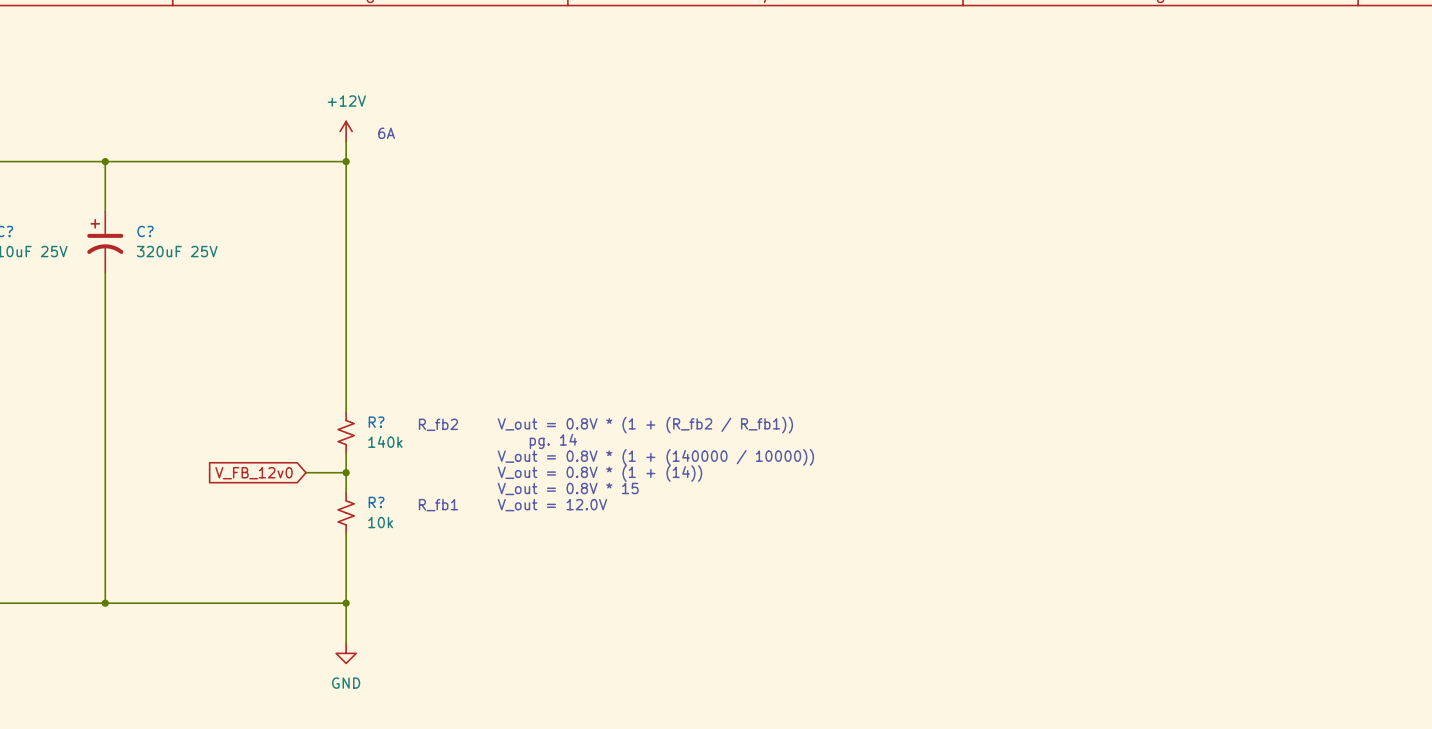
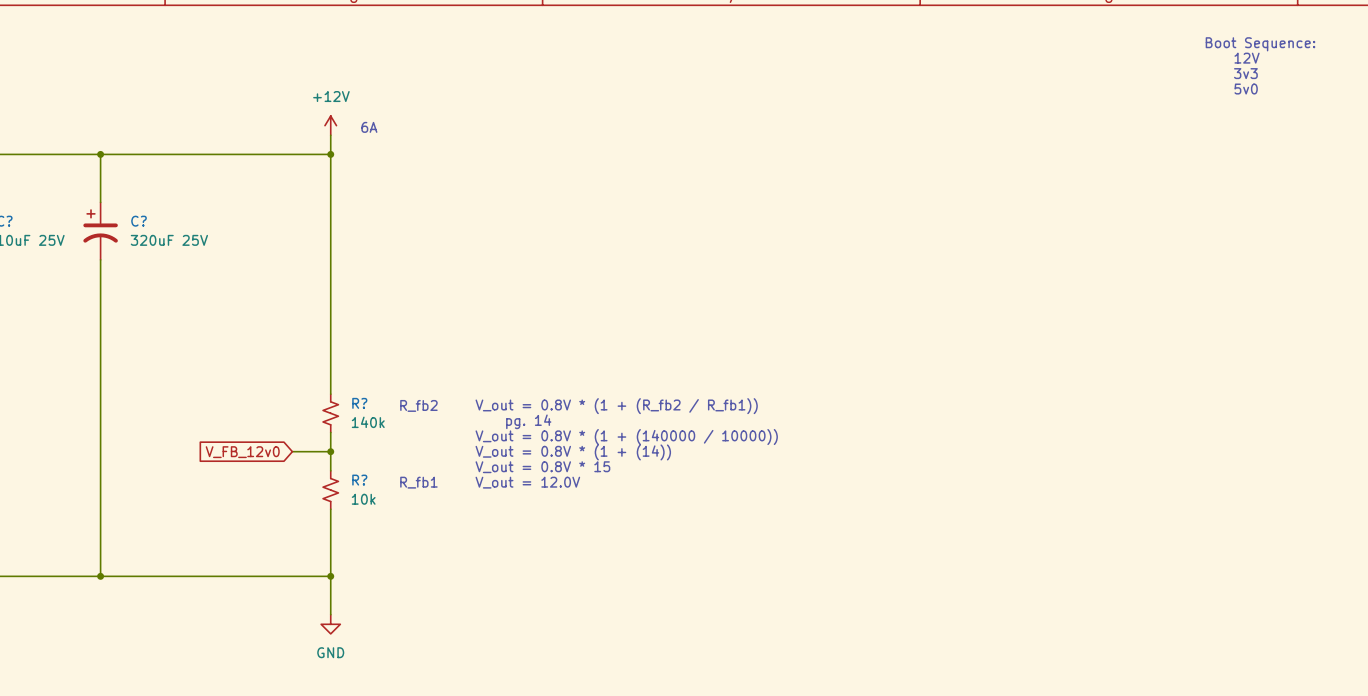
text: none -> Boot Sequence: (1260, 44)
text: none -> 12V (1247, 58)
text: none -> 3v3 (1245, 73)
text: none -> 5v0 (1246, 89)

